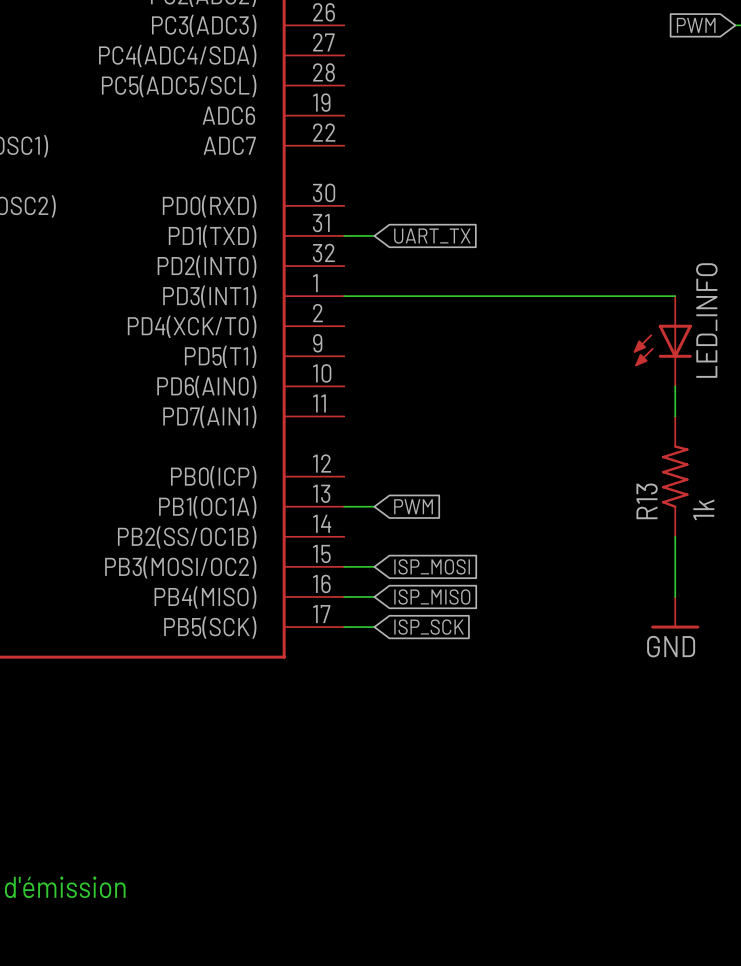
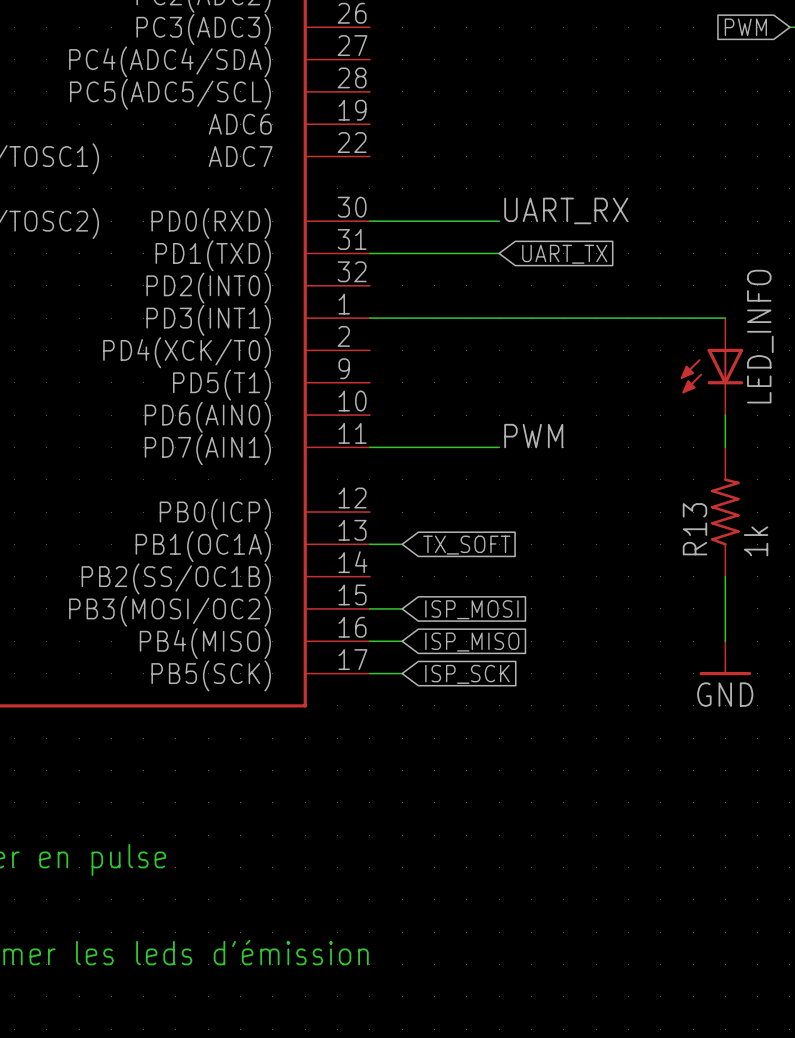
label: none -> UART_RX (566, 210)
wire: none -> (369, 221) (499, 221)
wire: none -> (402, 253) (499, 253)
global label position: UART_TX (432, 236) -> UART_TX (564, 254)
label: none -> PWM (533, 436)
wire: none -> (369, 447) (499, 447)
global label: PWM (413, 506) -> TX_SOFT (466, 545)

